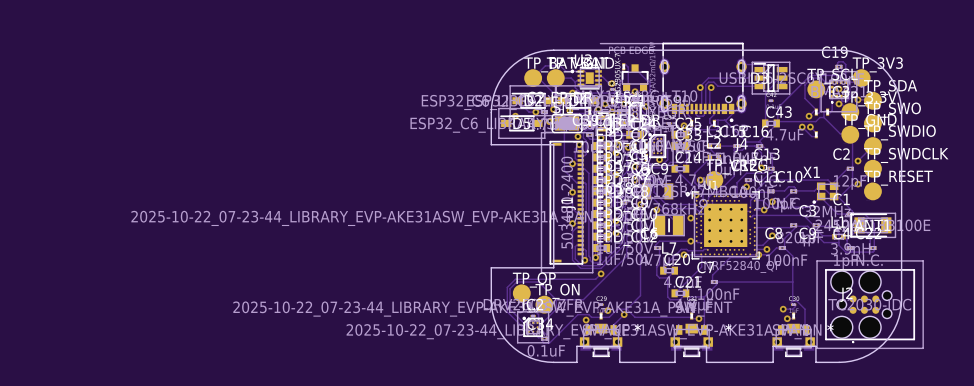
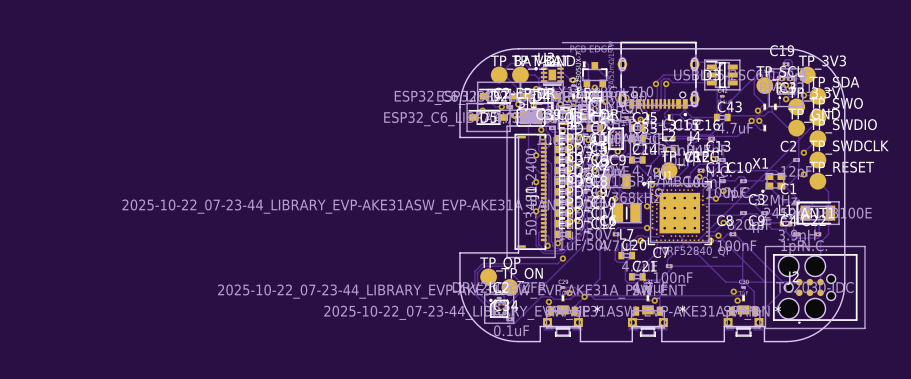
track: none -> (720, 96) (720, 113) (716, 117) (692, 117) (678, 103) (638, 103)
track: none -> (764, 109) (737, 136) (605, 136)
track: none -> (817, 117) (817, 121) (698, 240)
track: none -> (616, 135) (619, 135) (619, 209)
track: none -> (817, 181) (828, 191) (828, 234) (820, 242) (820, 282) (725, 282) (679, 236)
track: none -> (718, 235) (765, 282)
track: none -> (742, 242) (782, 282)
track: none -> (561, 287) (575, 287) (584, 296)
track: none -> (564, 287) (572, 295) (743, 295)
track: none -> (780, 292) (762, 311) (755, 311)

